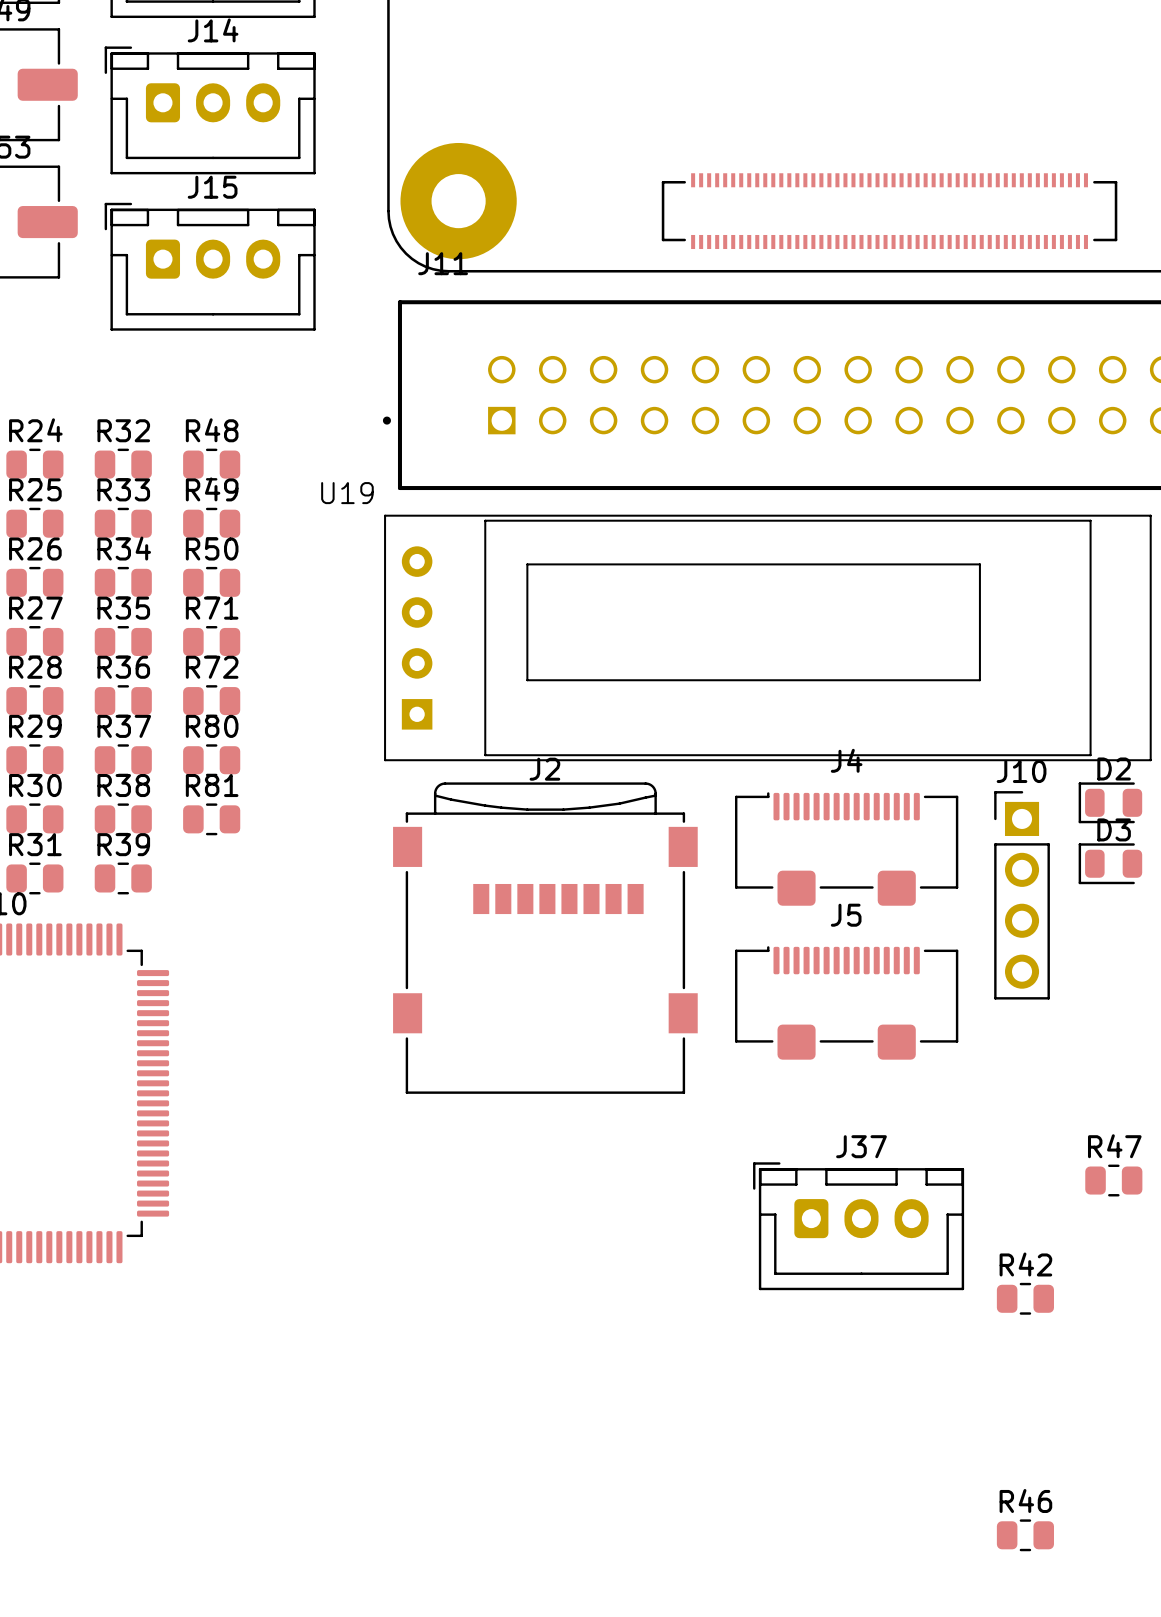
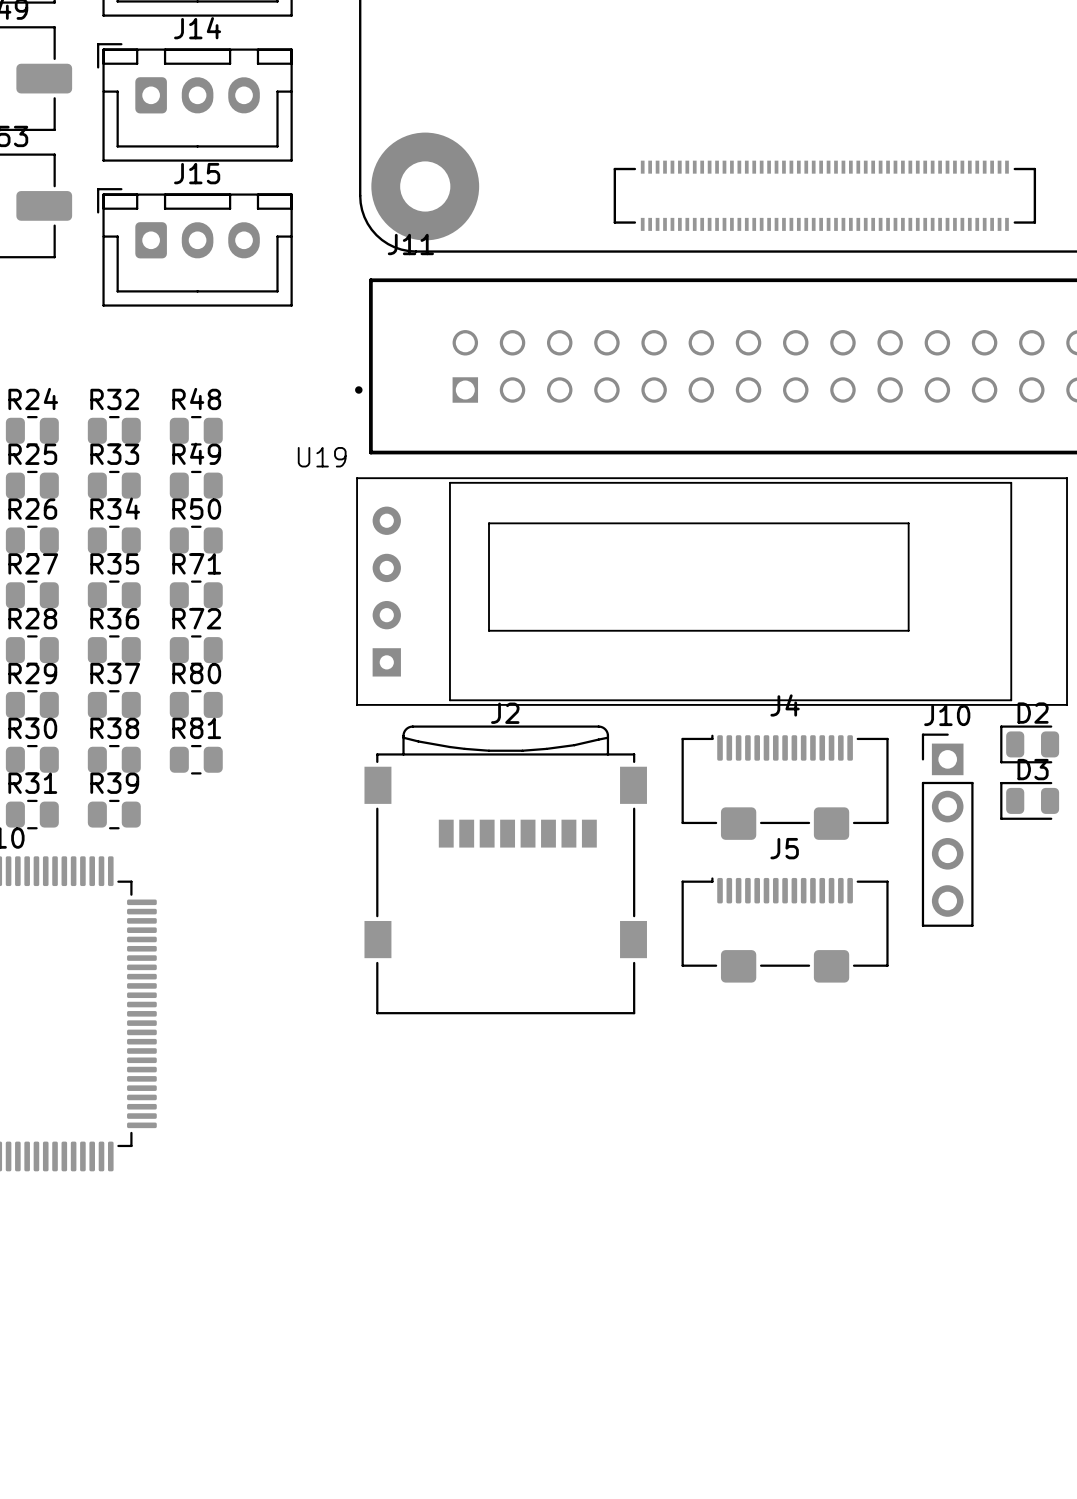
R47: (1113, 1180) -> none
J37: (858, 1226) -> none
R42: (1025, 1298) -> none
R46: (1025, 1535) -> none

